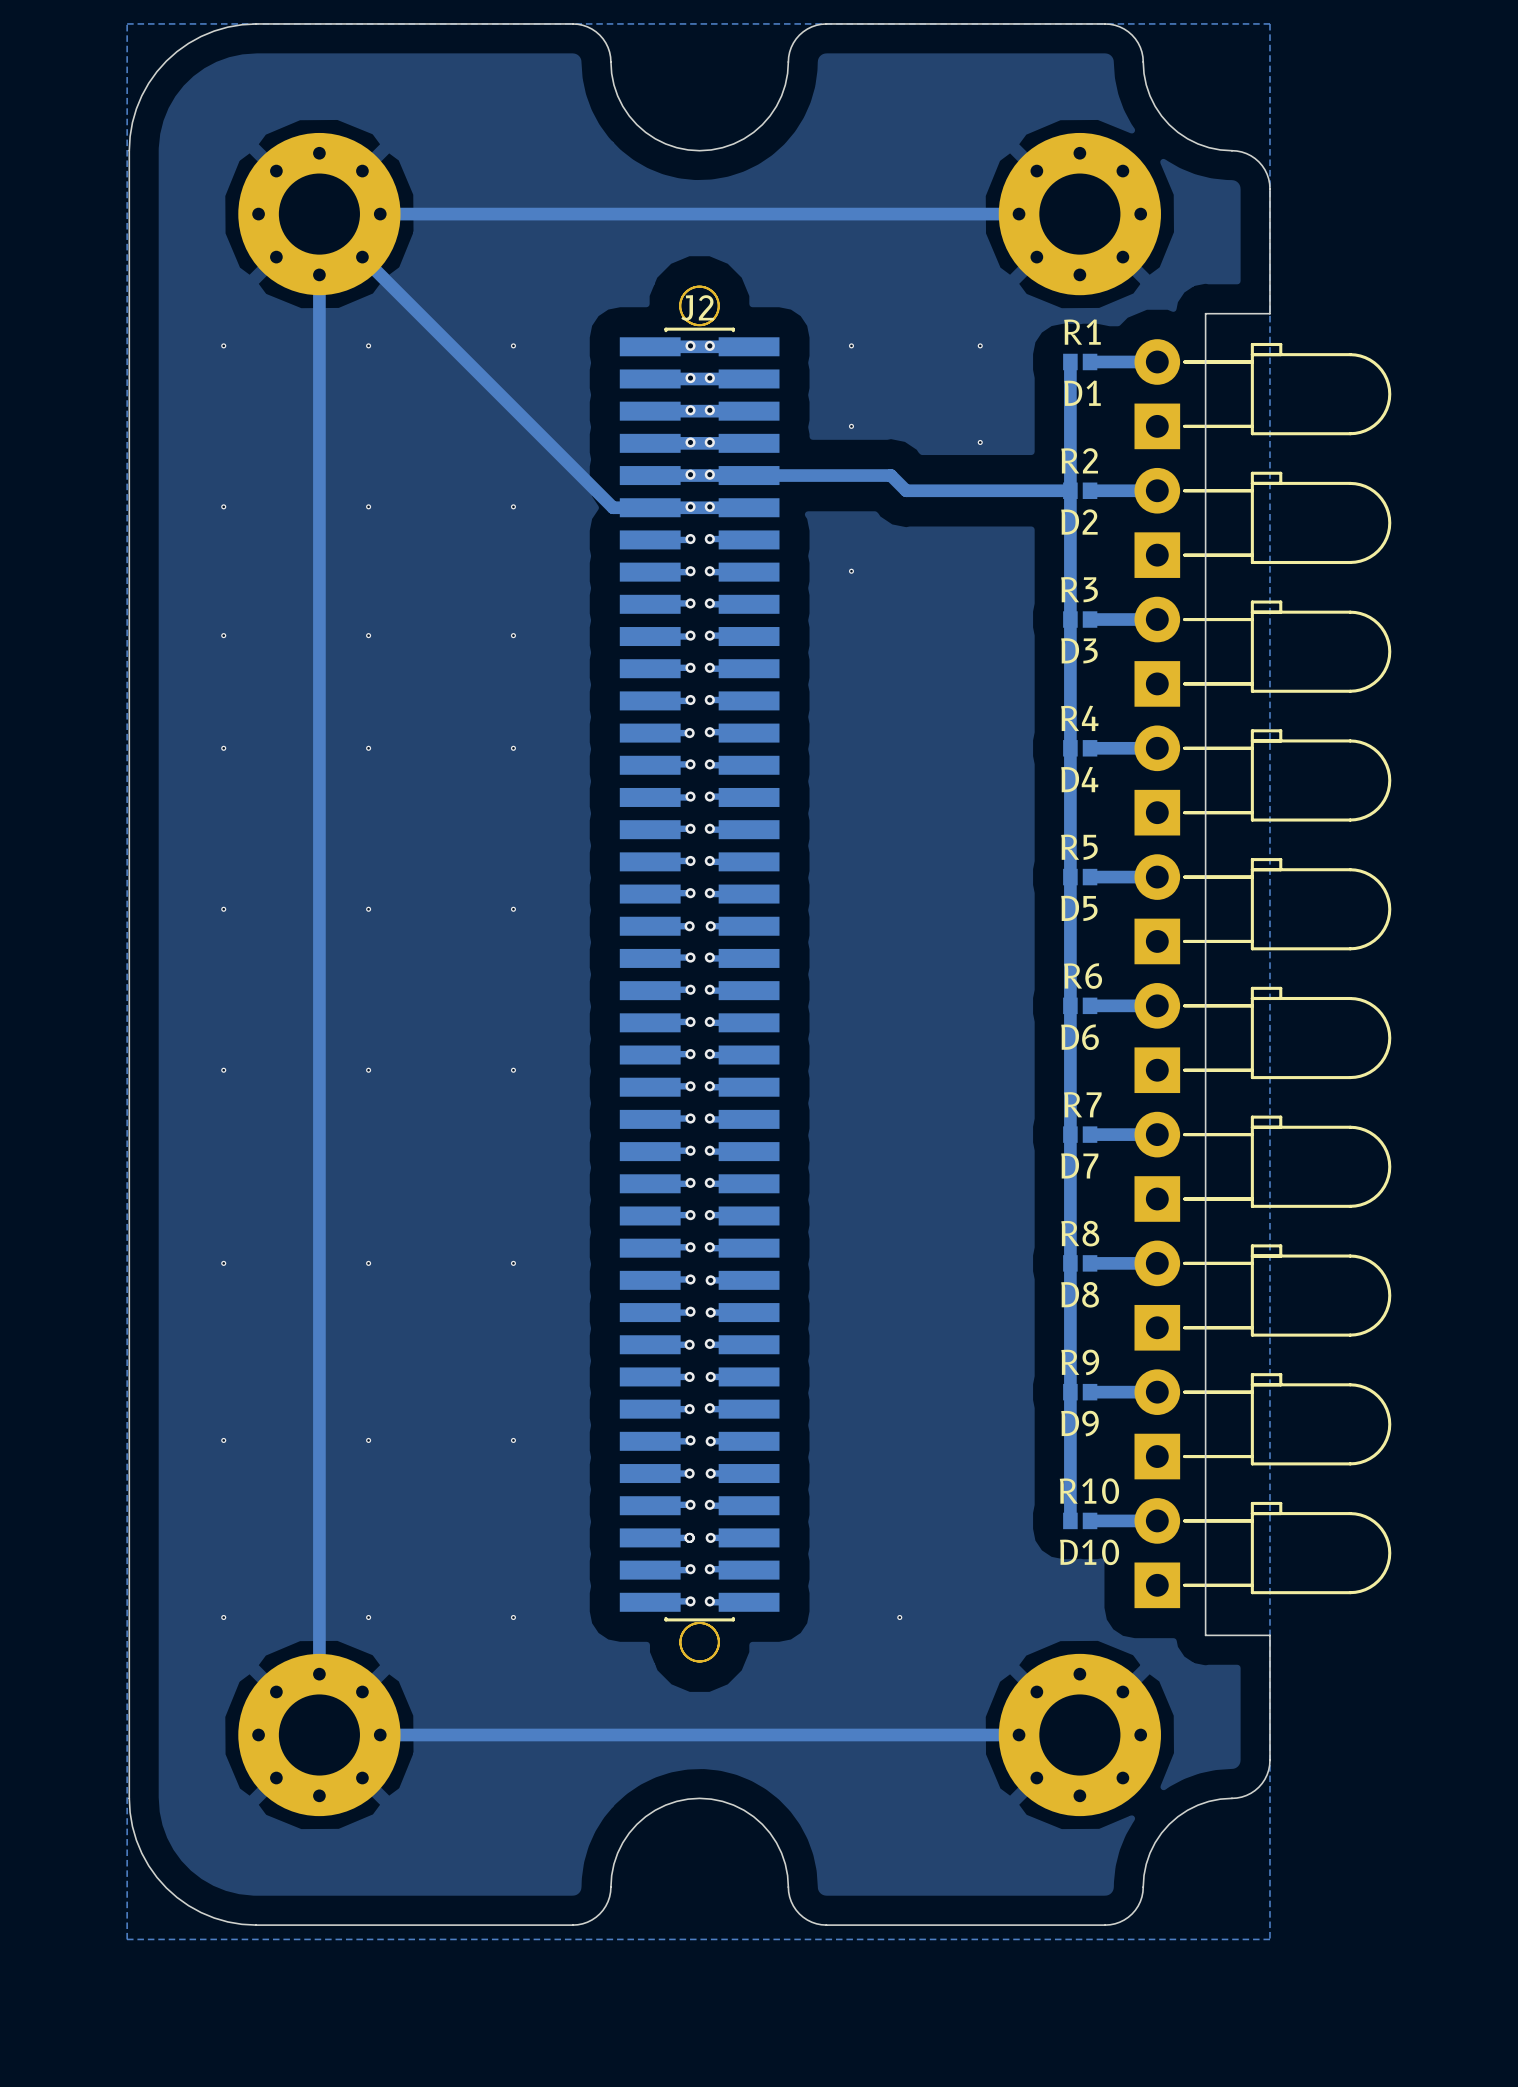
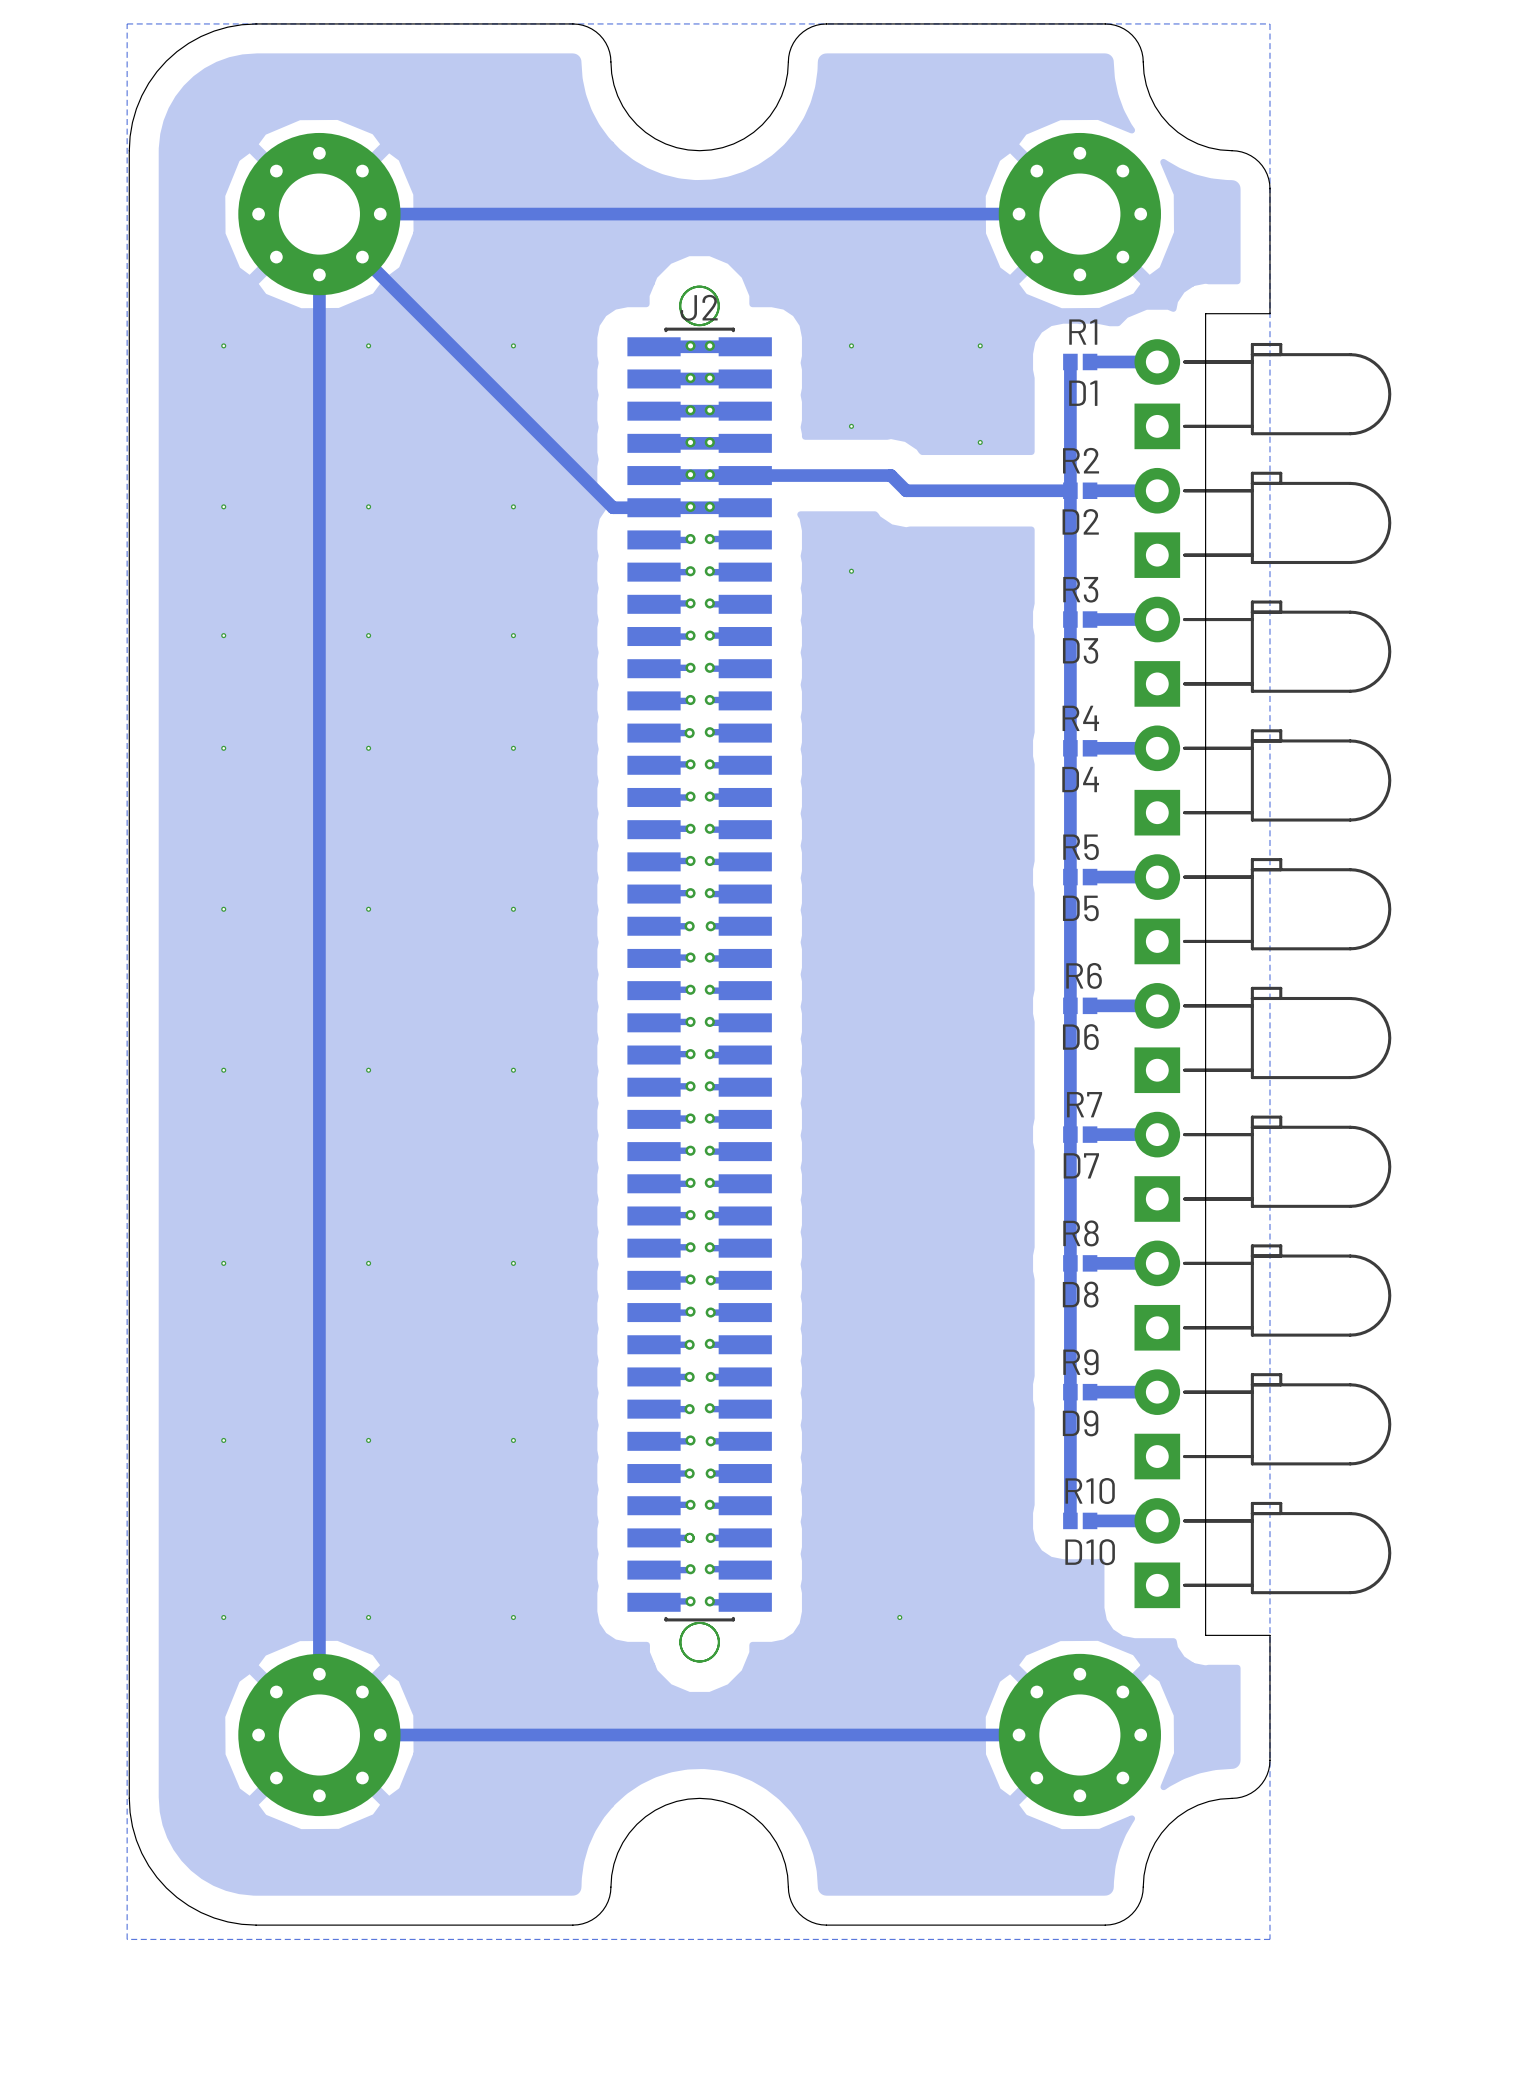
J2 footprint: [619, 285, 780, 1663] -> [627, 285, 772, 1663]

